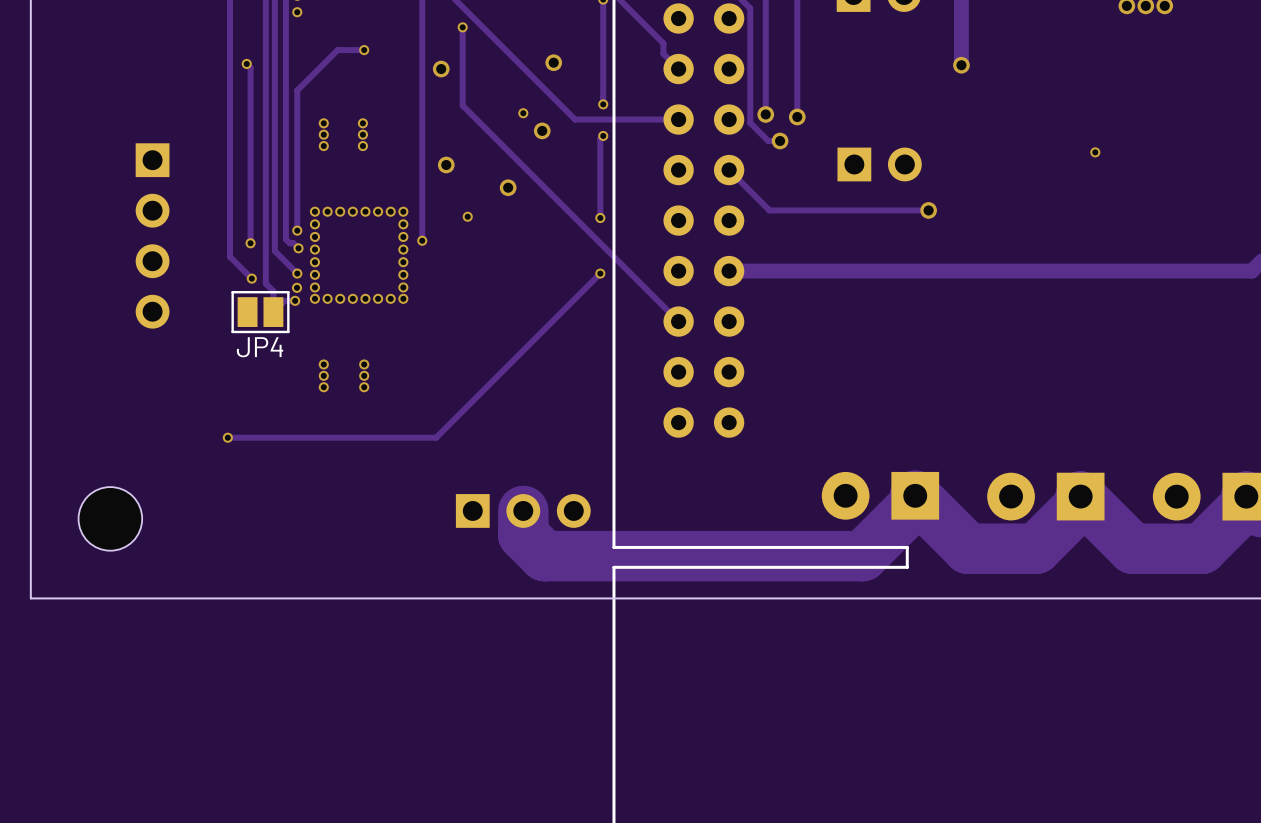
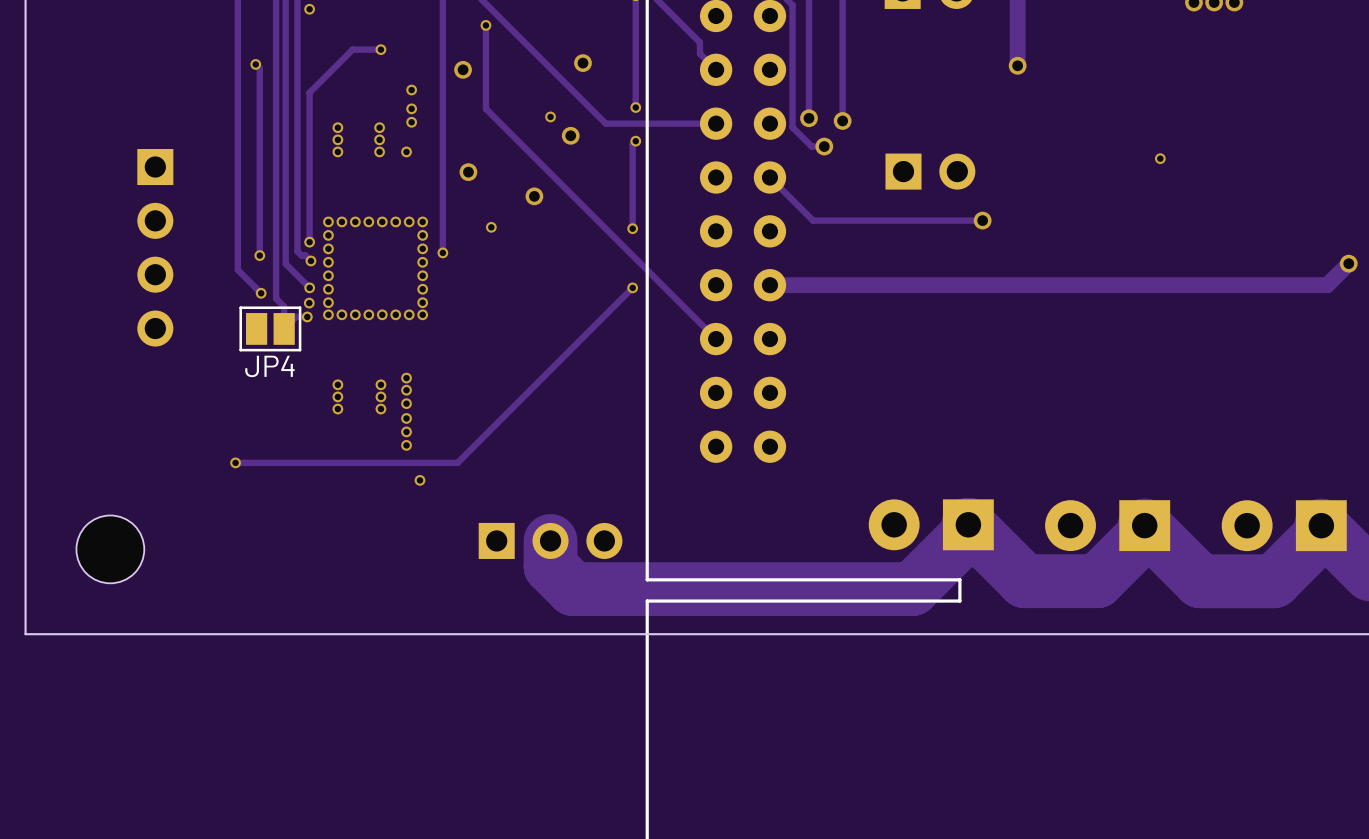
via: none -> (411, 90)
via: none -> (411, 108)
via: none -> (411, 122)
via: none -> (406, 151)
via: none -> (406, 378)
via: none -> (406, 390)
via: none -> (406, 403)
via: none -> (406, 418)
via: none -> (406, 431)
via: none -> (406, 445)
via: none -> (419, 480)

